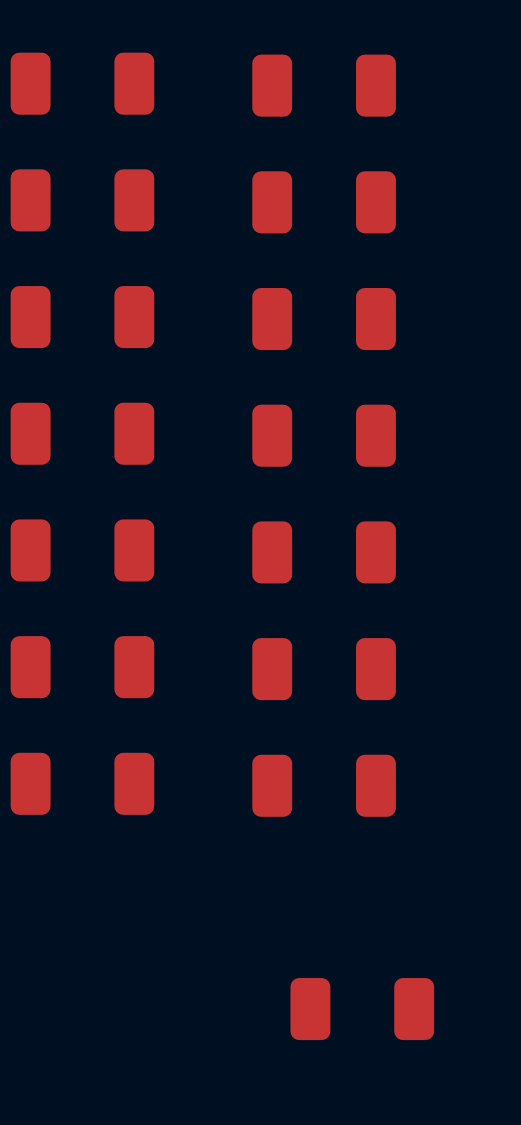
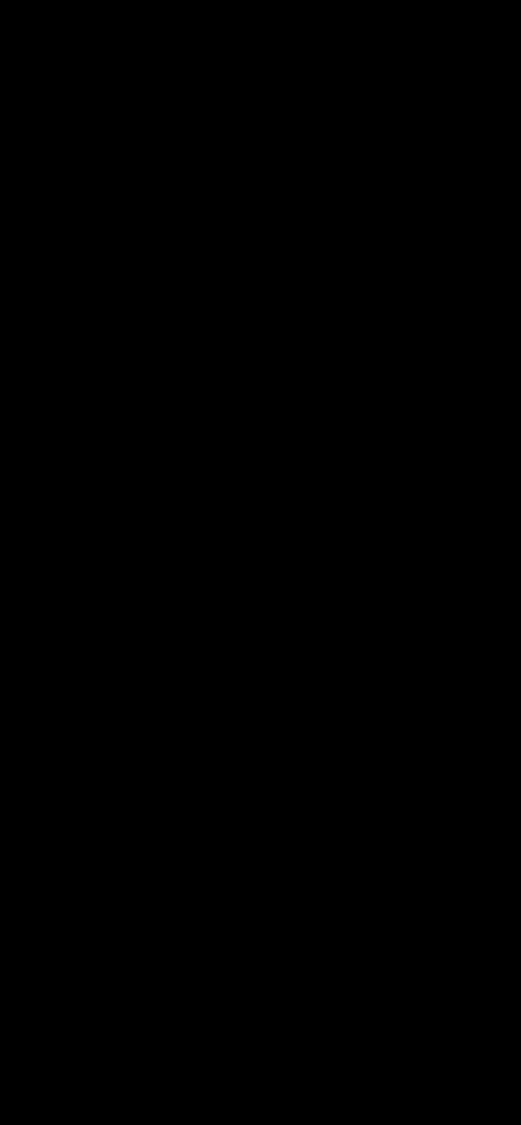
part: (82, 83) -> none
part: (324, 85) -> none
part: (82, 200) -> none
part: (324, 202) -> none
part: (82, 317) -> none
part: (324, 319) -> none
part: (82, 433) -> none
part: (324, 435) -> none
part: (82, 550) -> none
part: (324, 552) -> none
part: (82, 667) -> none
part: (324, 669) -> none
part: (82, 783) -> none
part: (324, 785) -> none
part: (362, 1009) -> none

